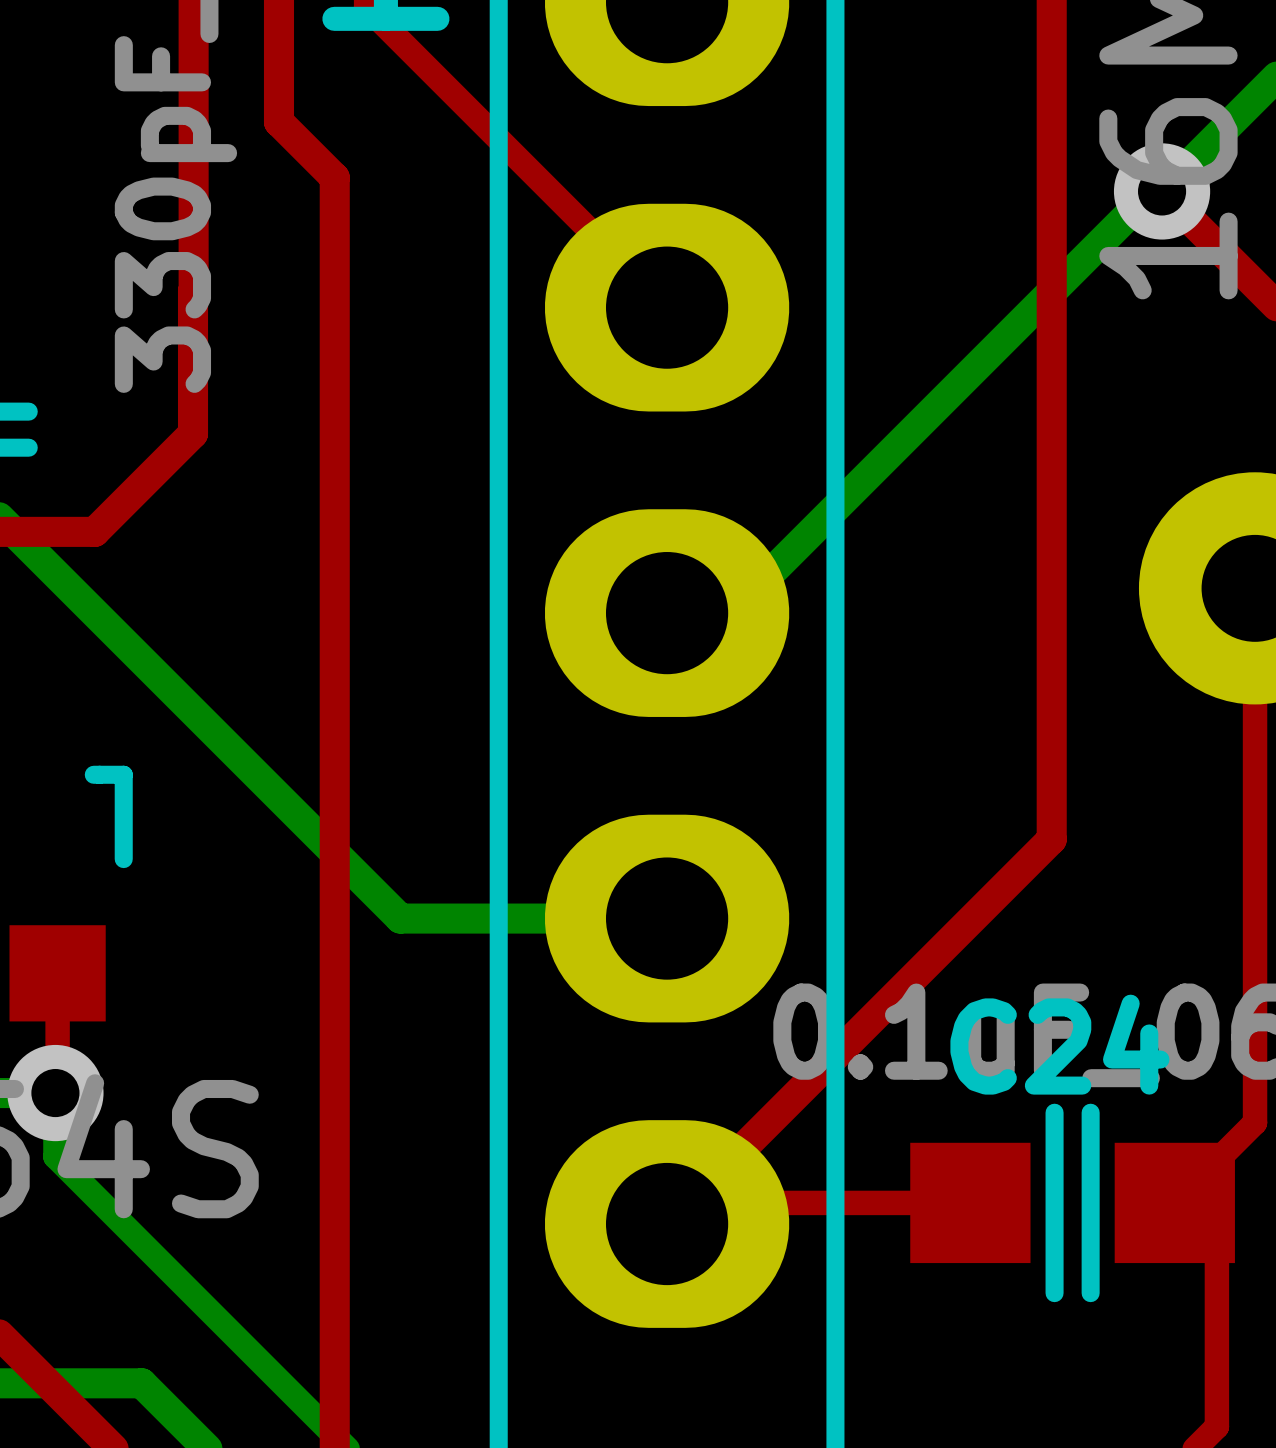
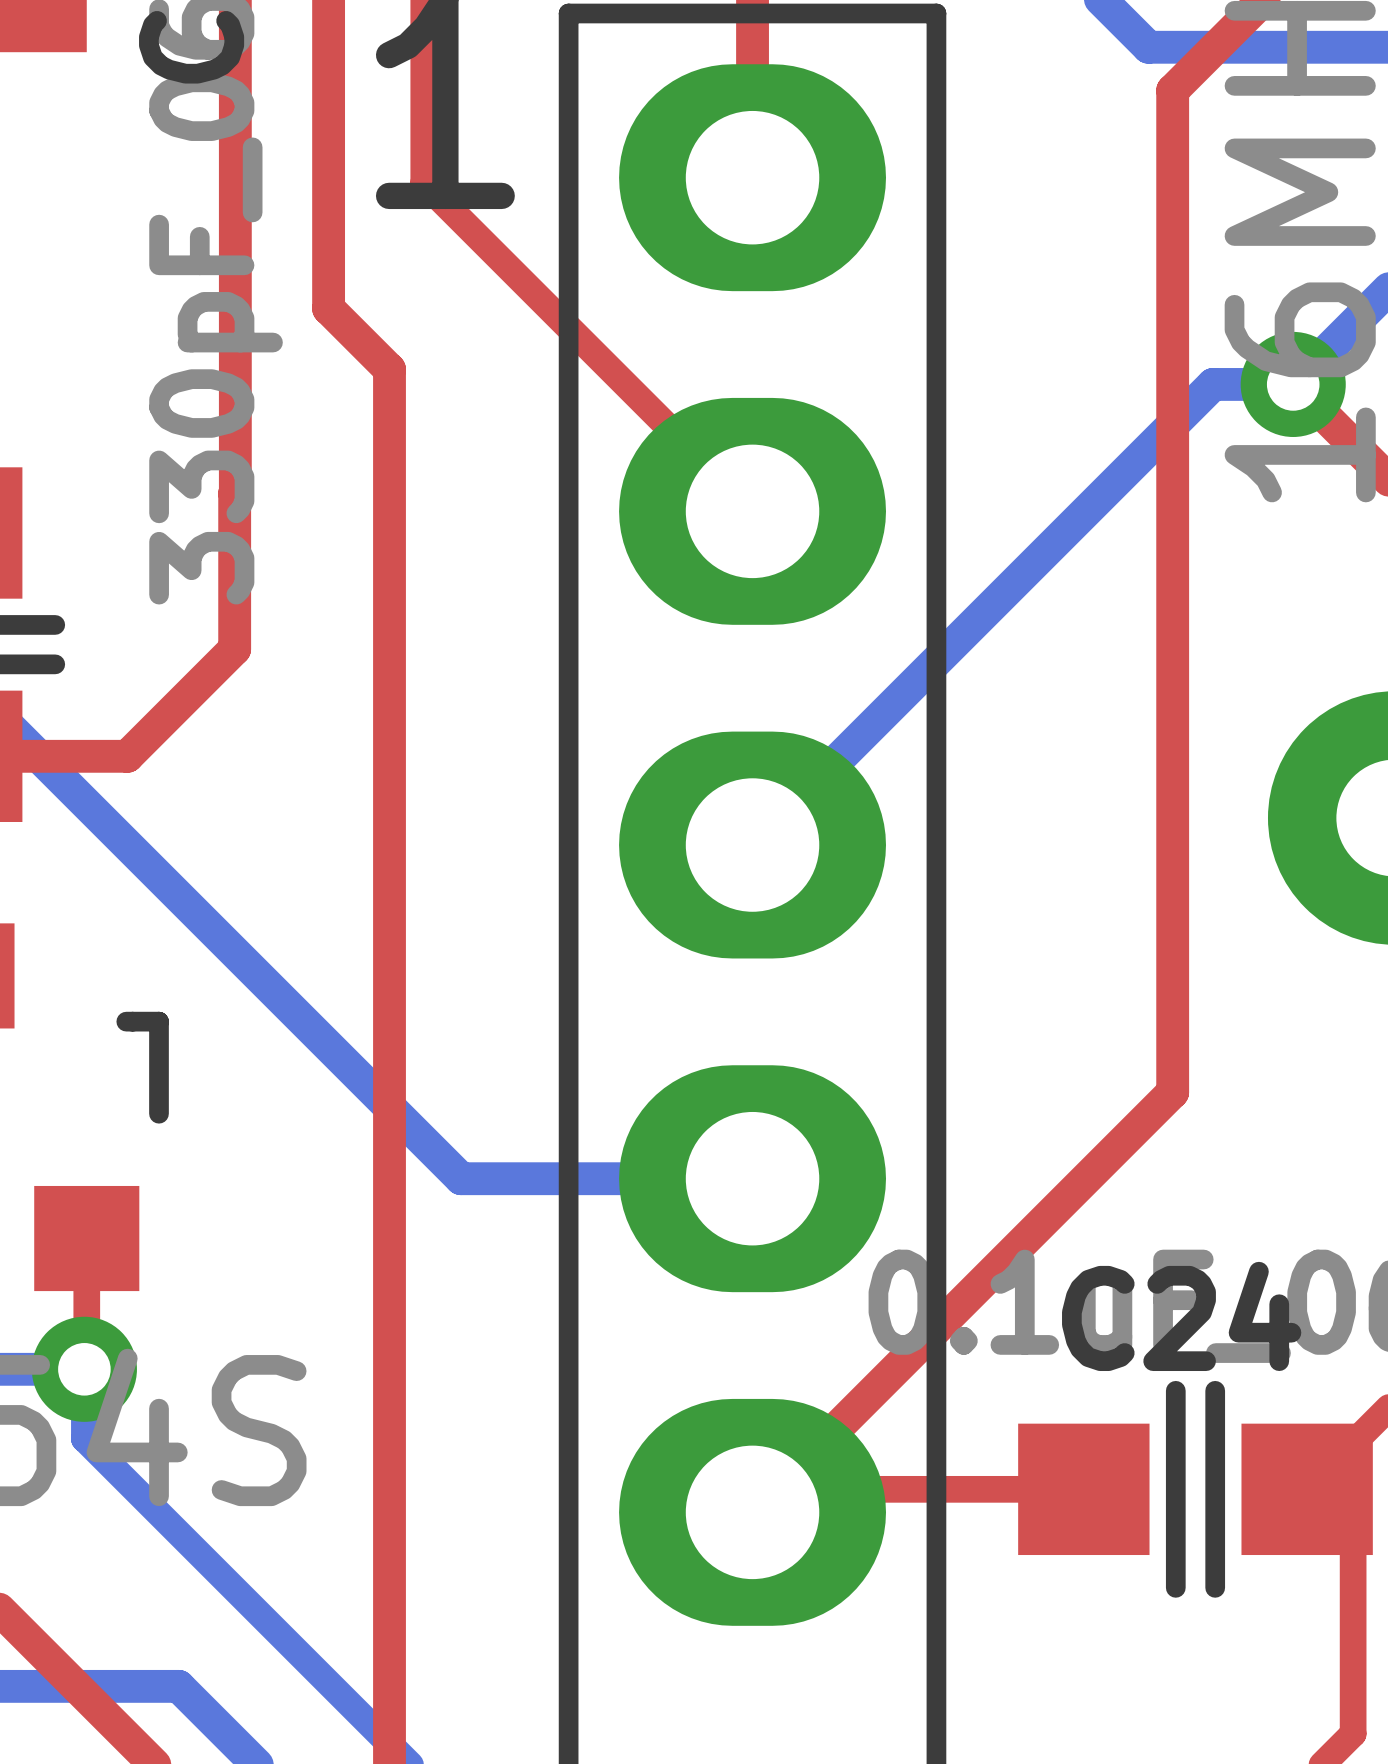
bottom track: (1152, 191) (730, 613) (667, 613) -> (1282, 384) (1213, 384) (752, 845)

